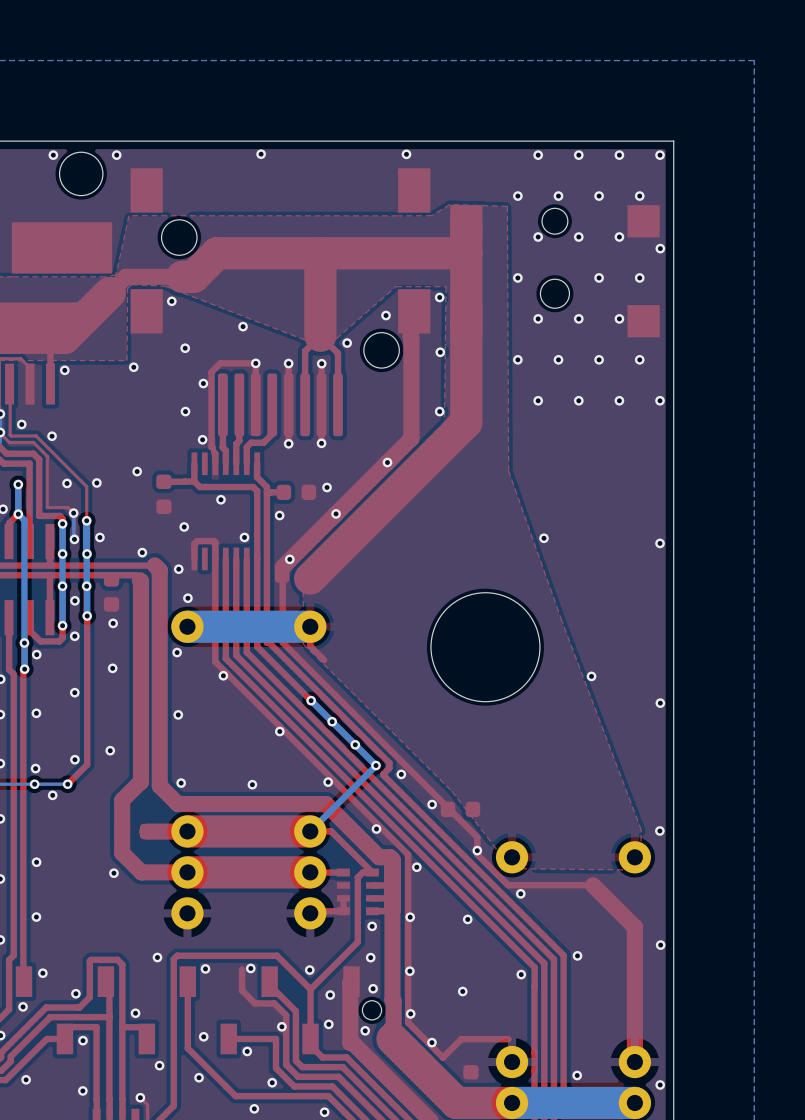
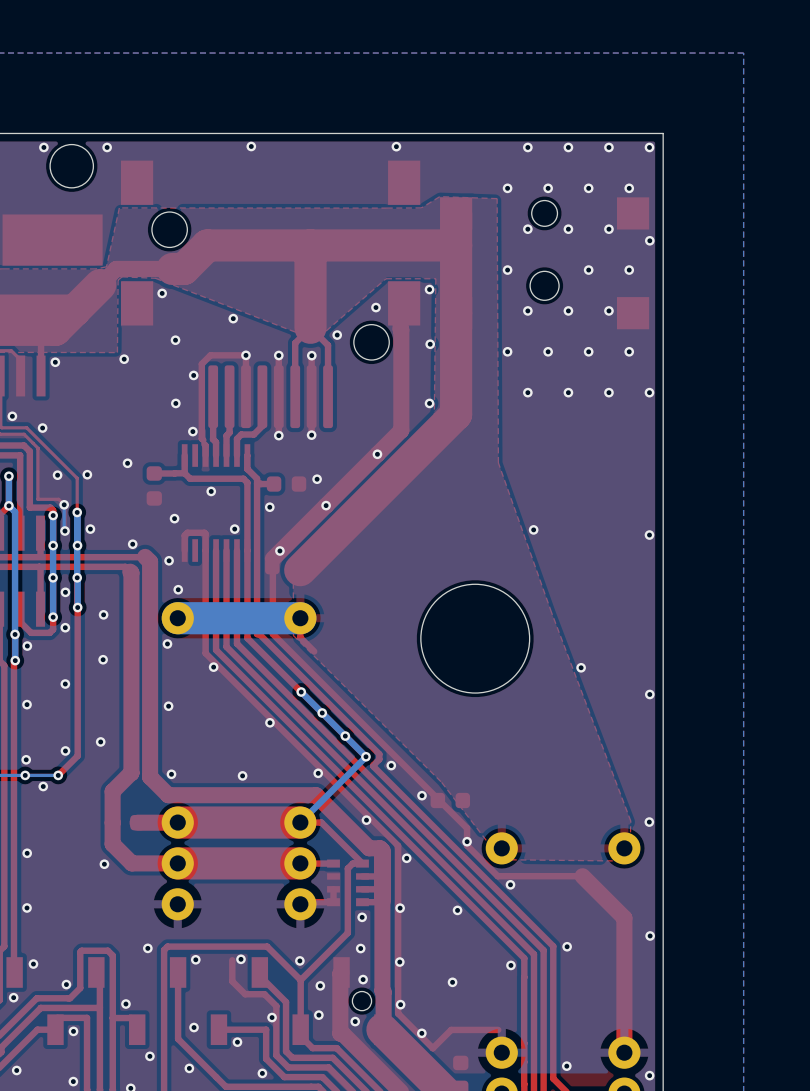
part: (111, 591) -> none

